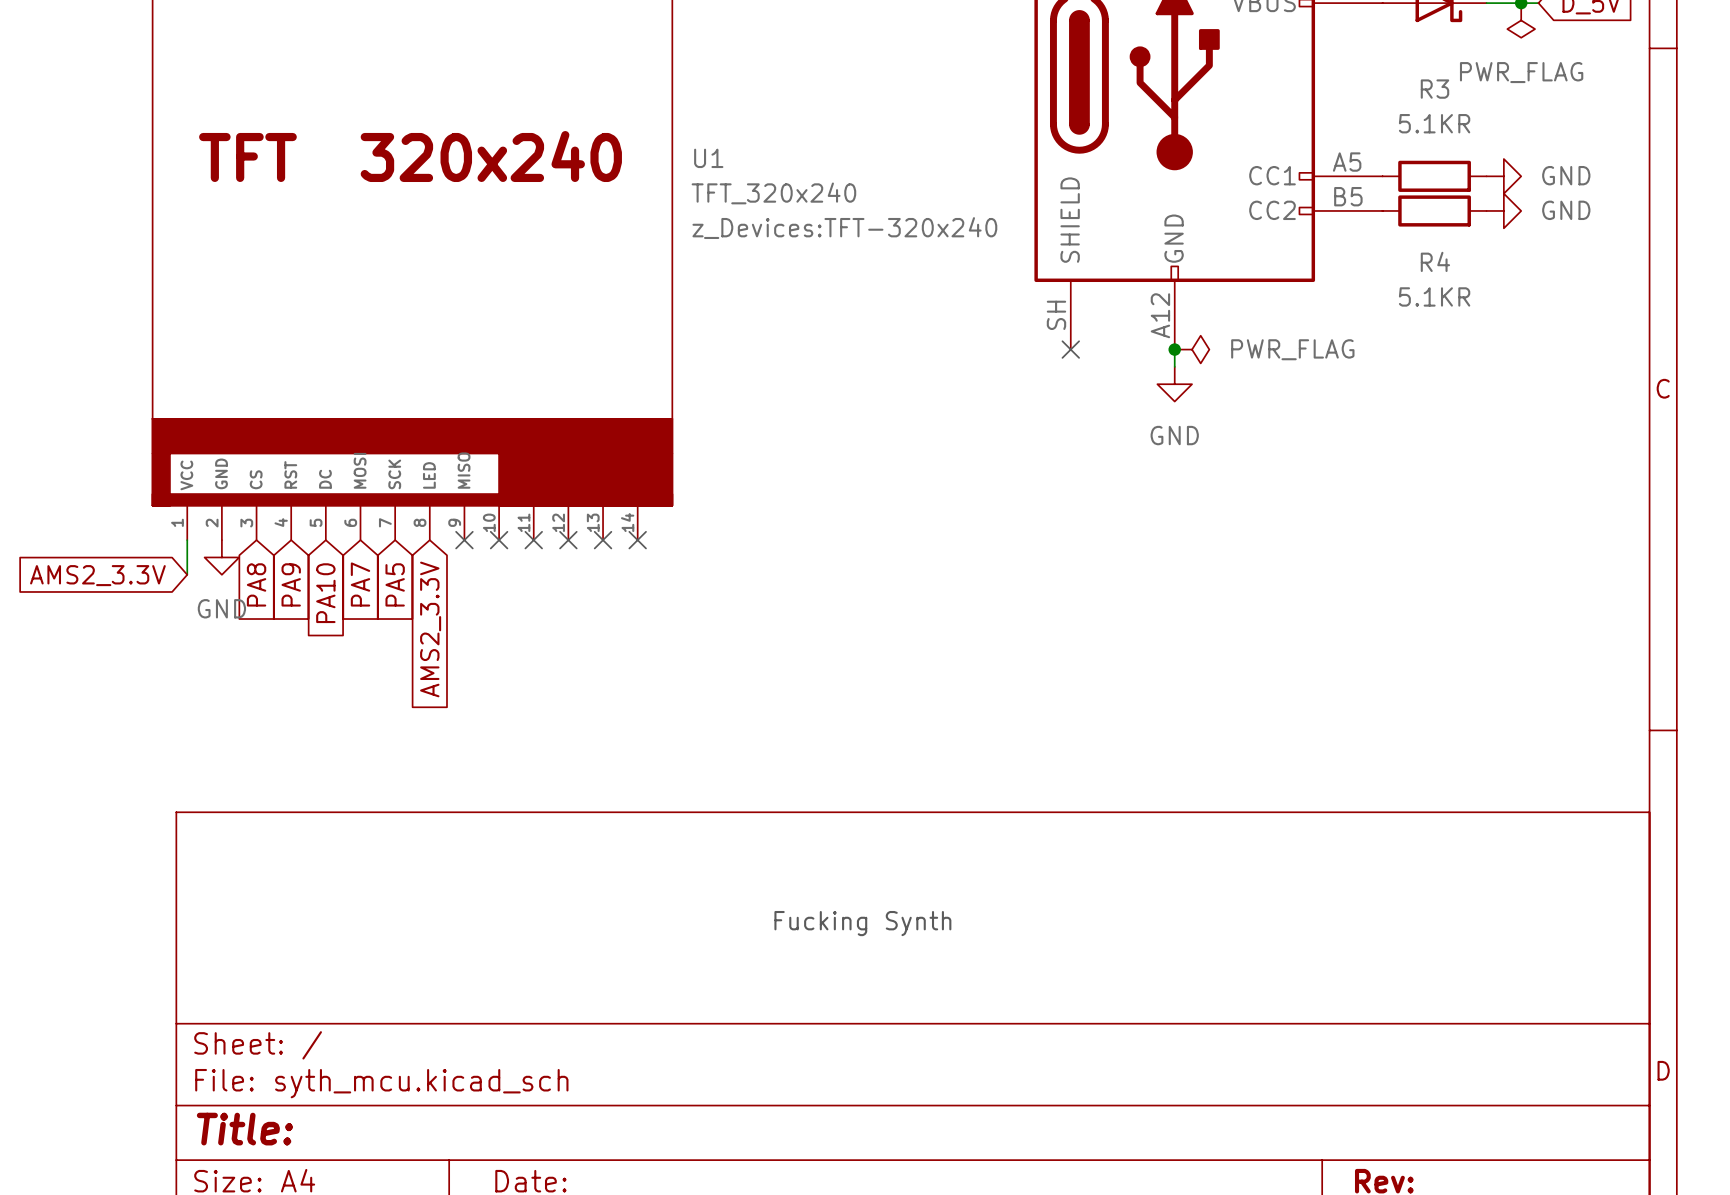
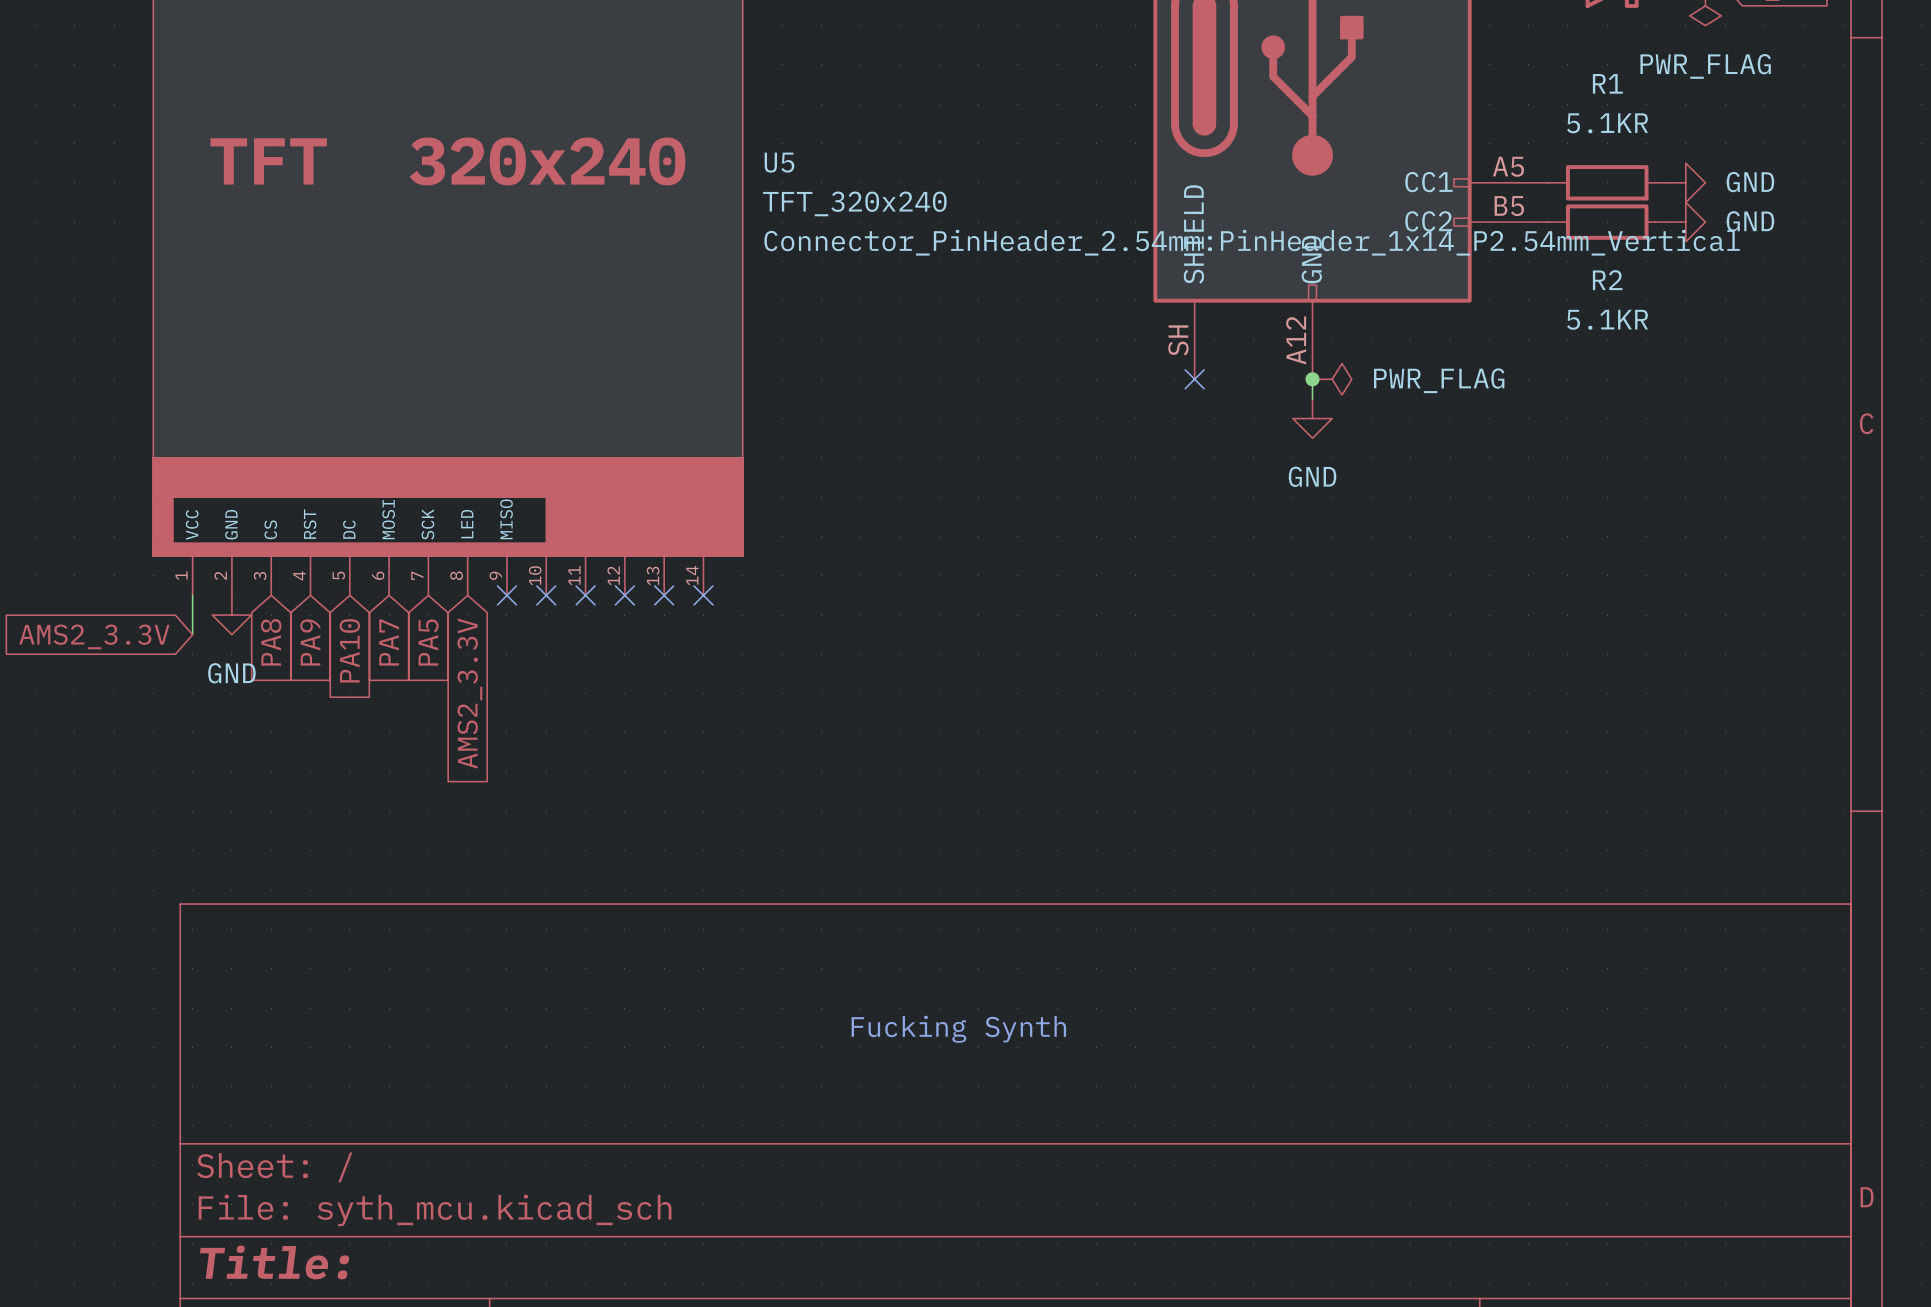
R3 name: R3 (1434, 89) -> R1 (1607, 83)
U1 name: U1 (708, 158) -> U5 (779, 162)
U1 text: z_Devices:TFT-320x240 (844, 228) -> Connector_PinHeader_2.54mm:PinHeader_1x14_P2.54mm_Vertical (1252, 242)
R4 name: R4 (1435, 261) -> R2 (1607, 280)

